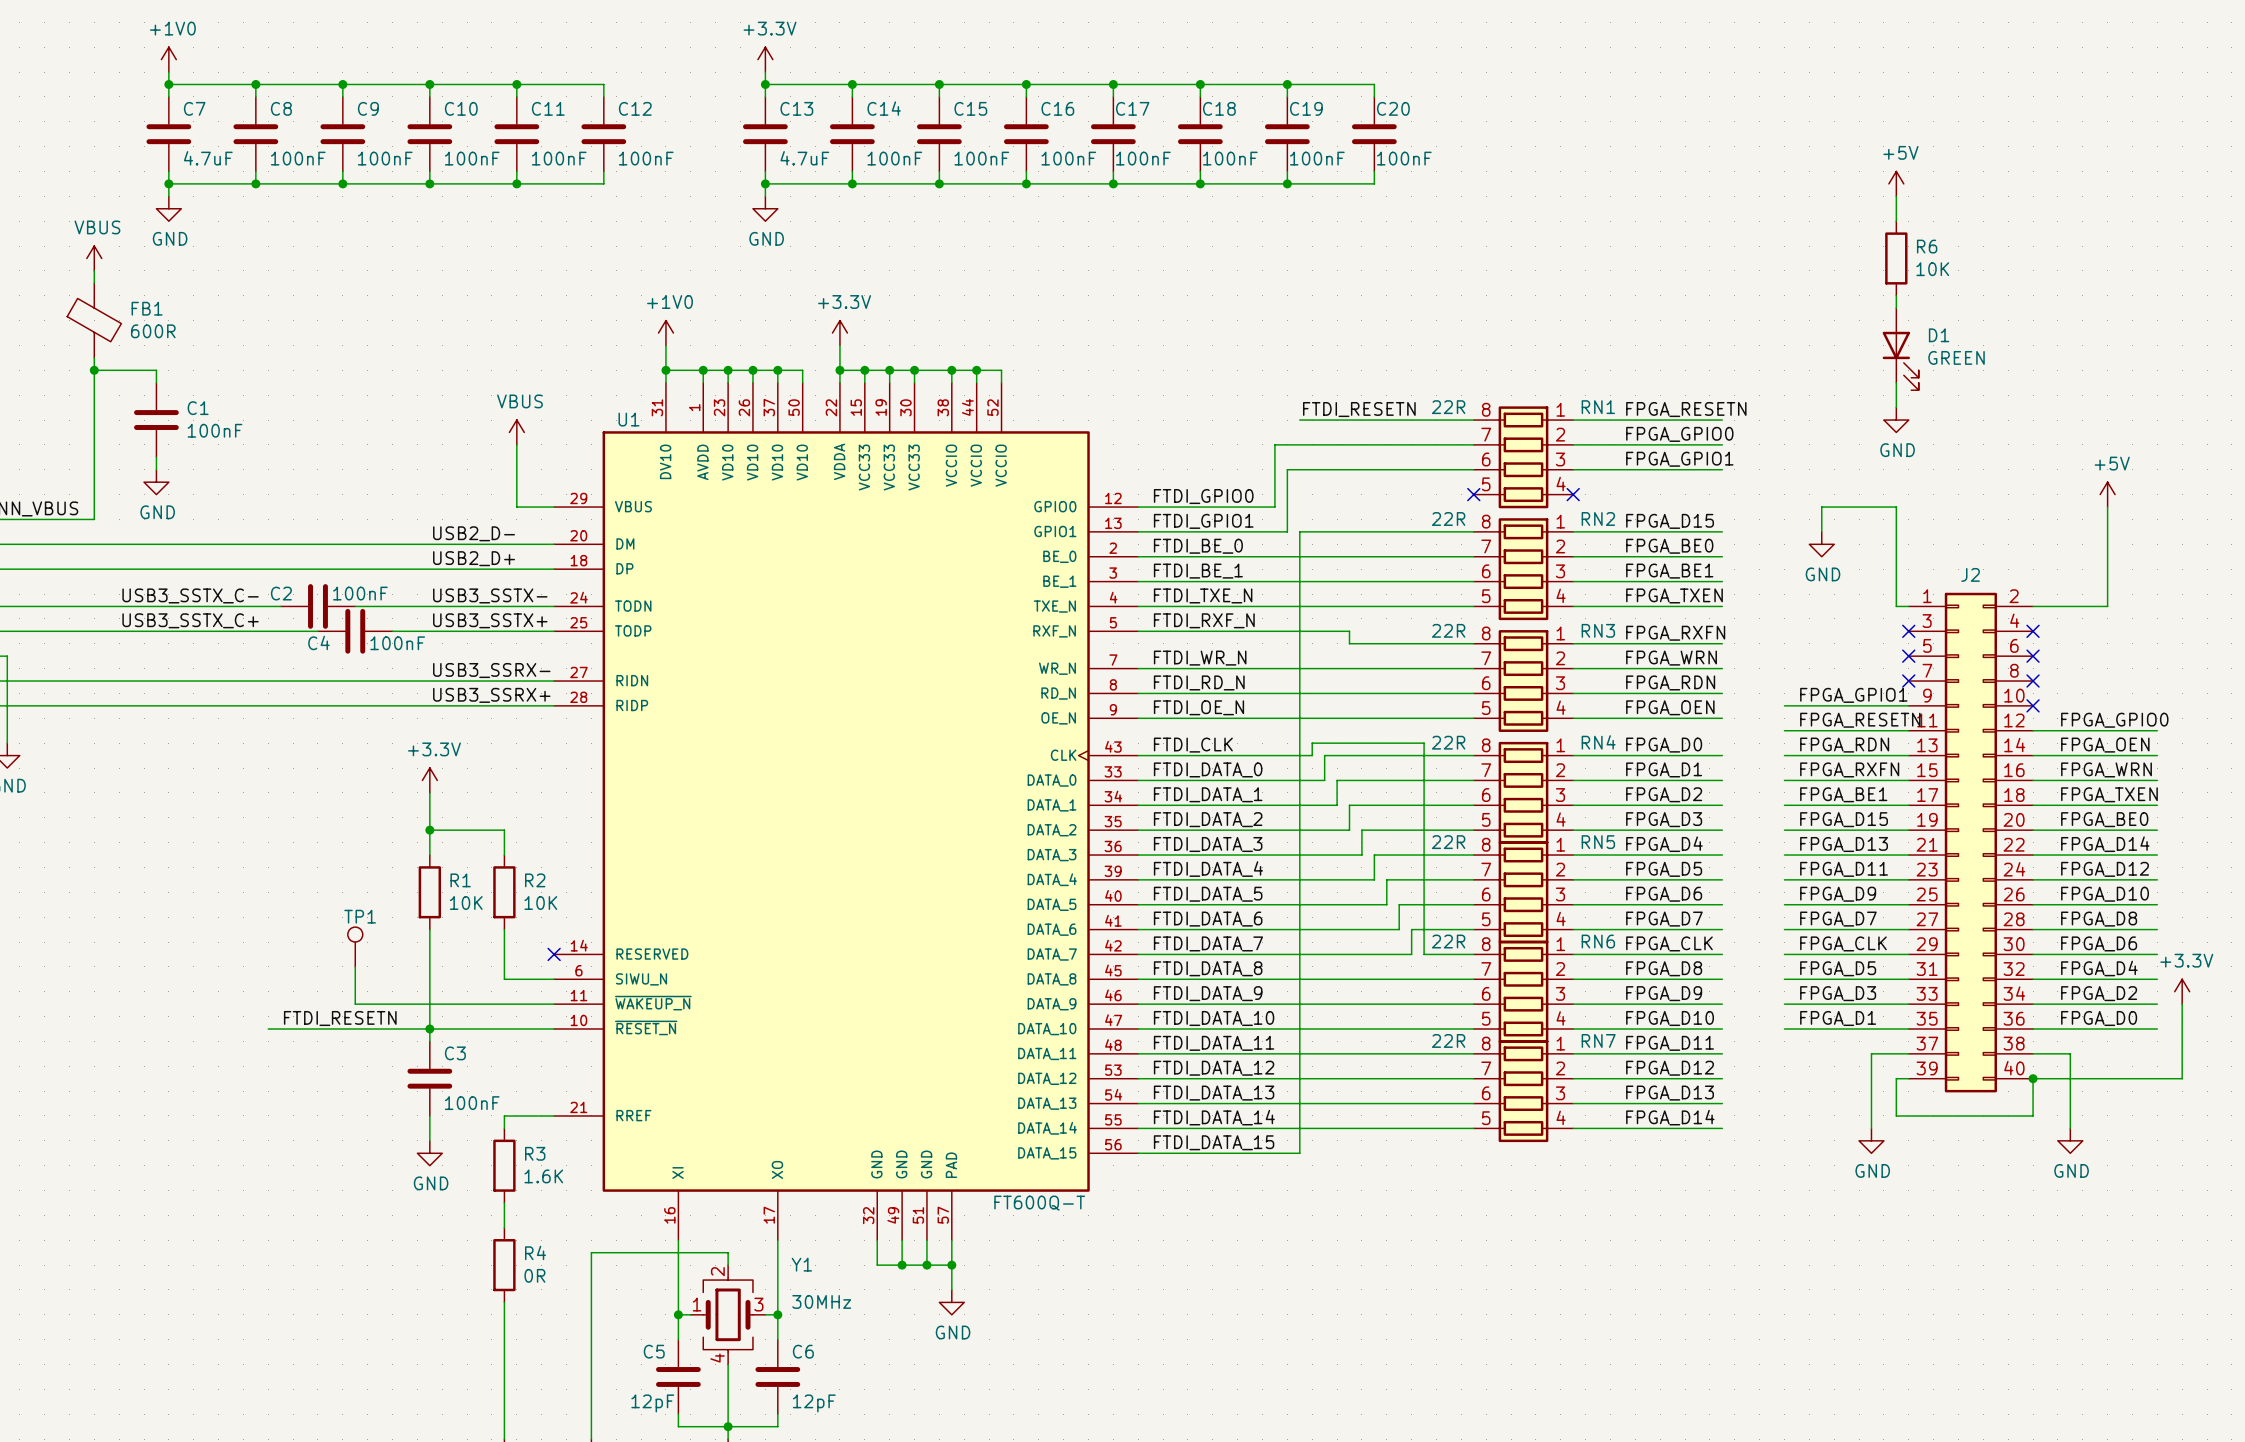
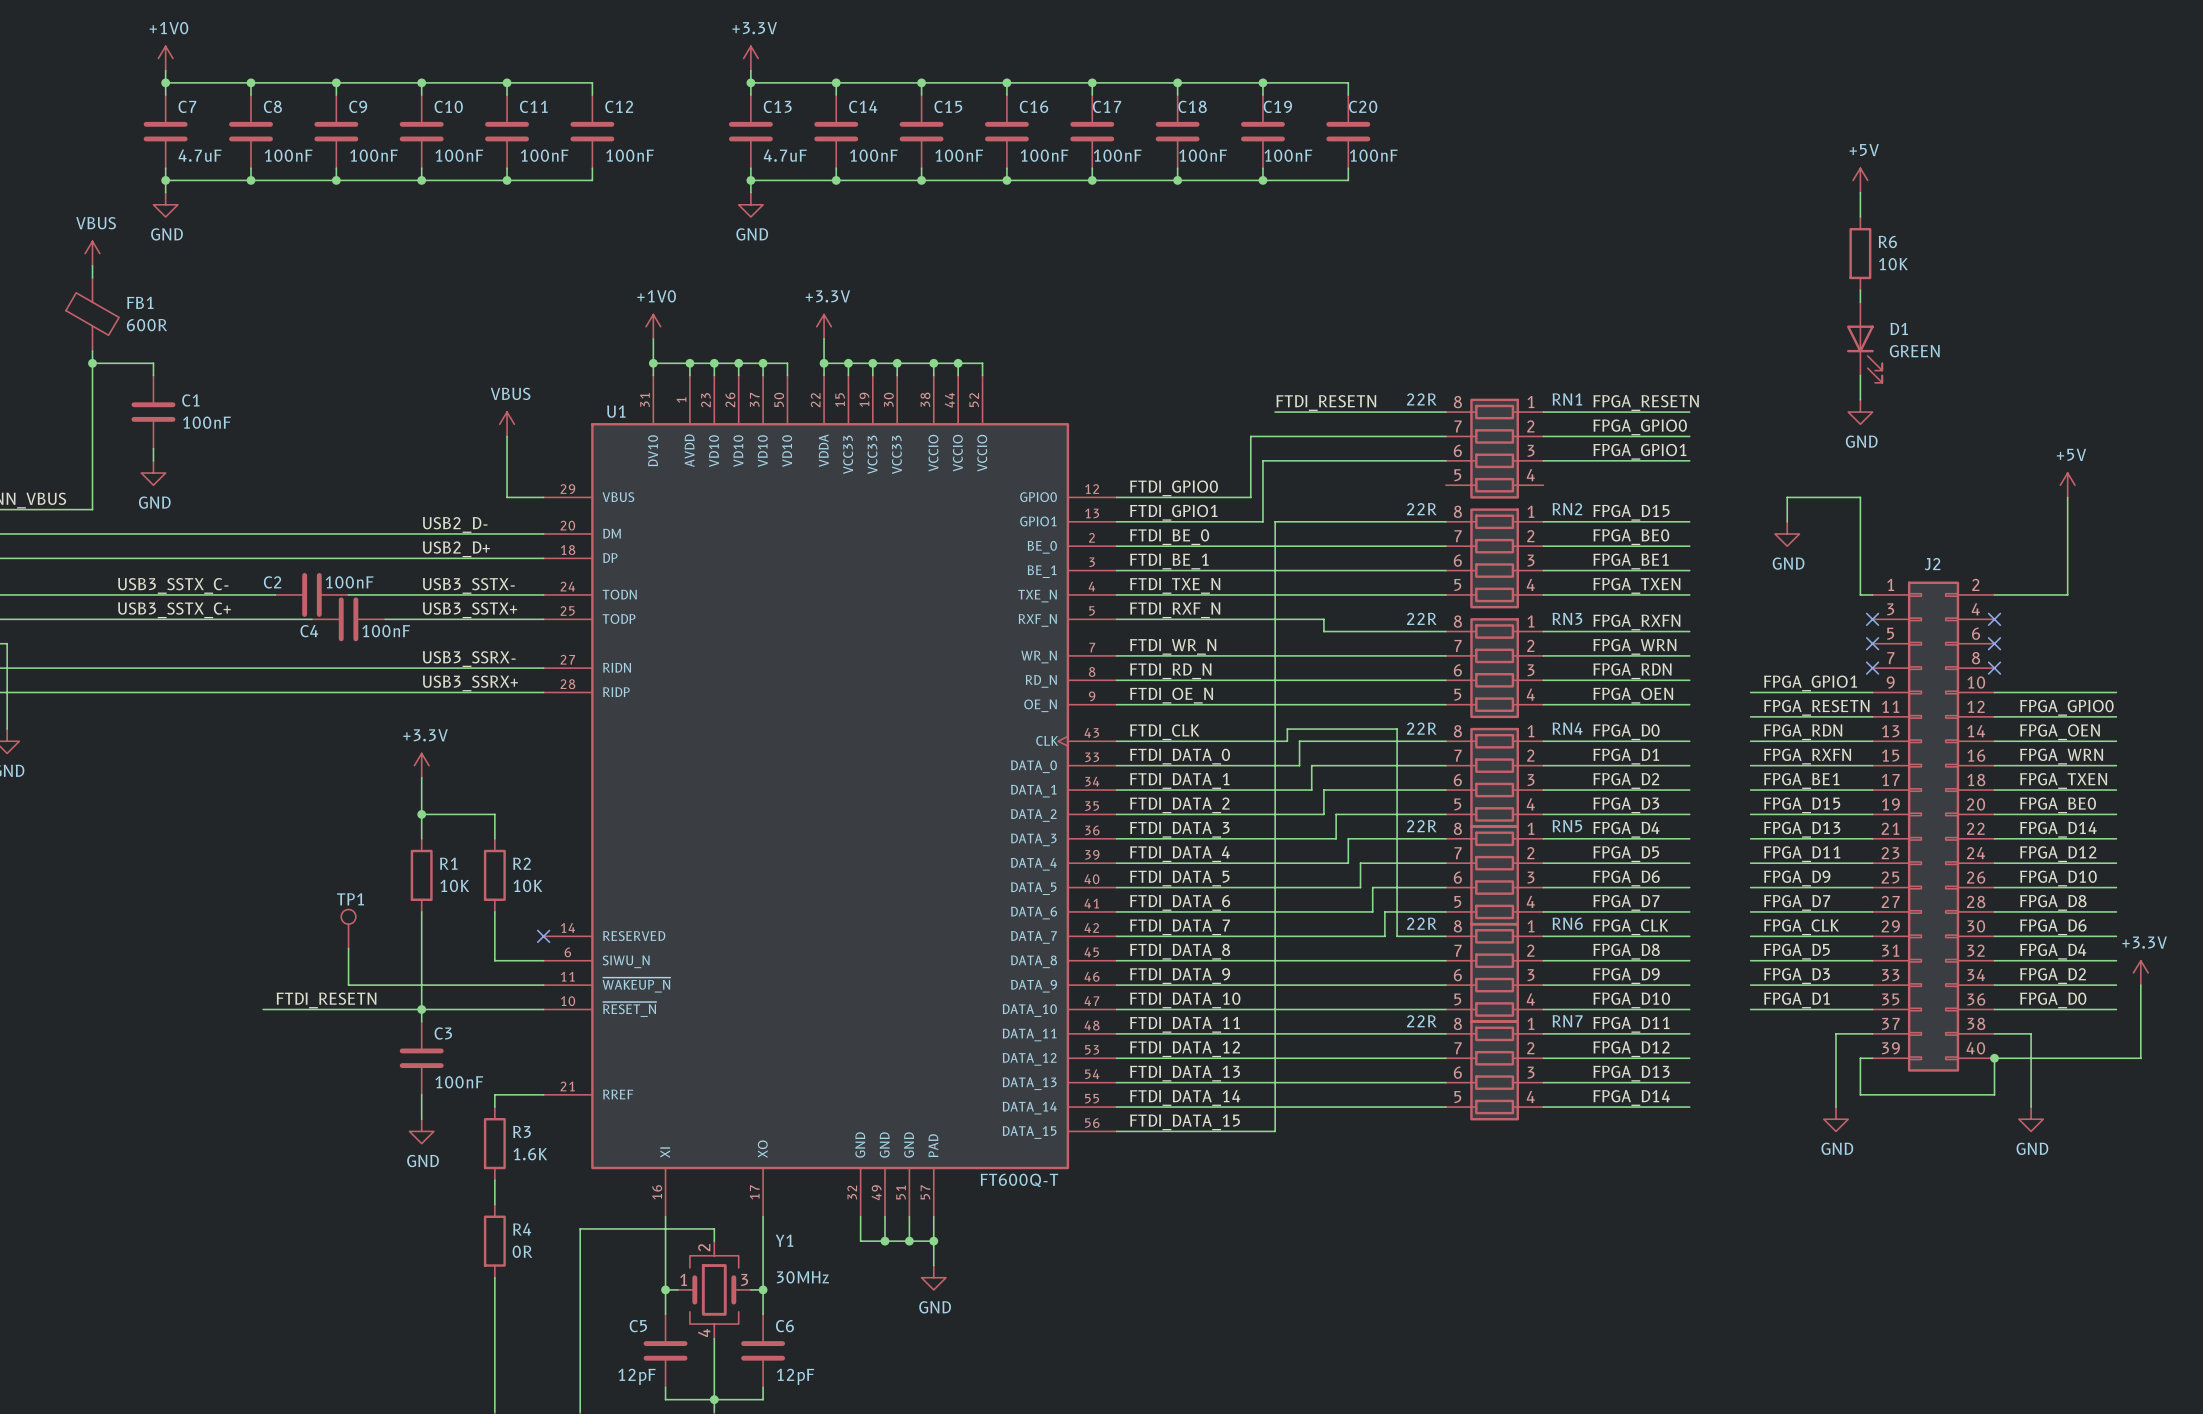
no-connect mark: (1473, 494) -> none
no-connect mark: (1573, 494) -> none
wire: none -> (1994, 692) (2116, 692)
no-connect mark: (2033, 705) -> none

